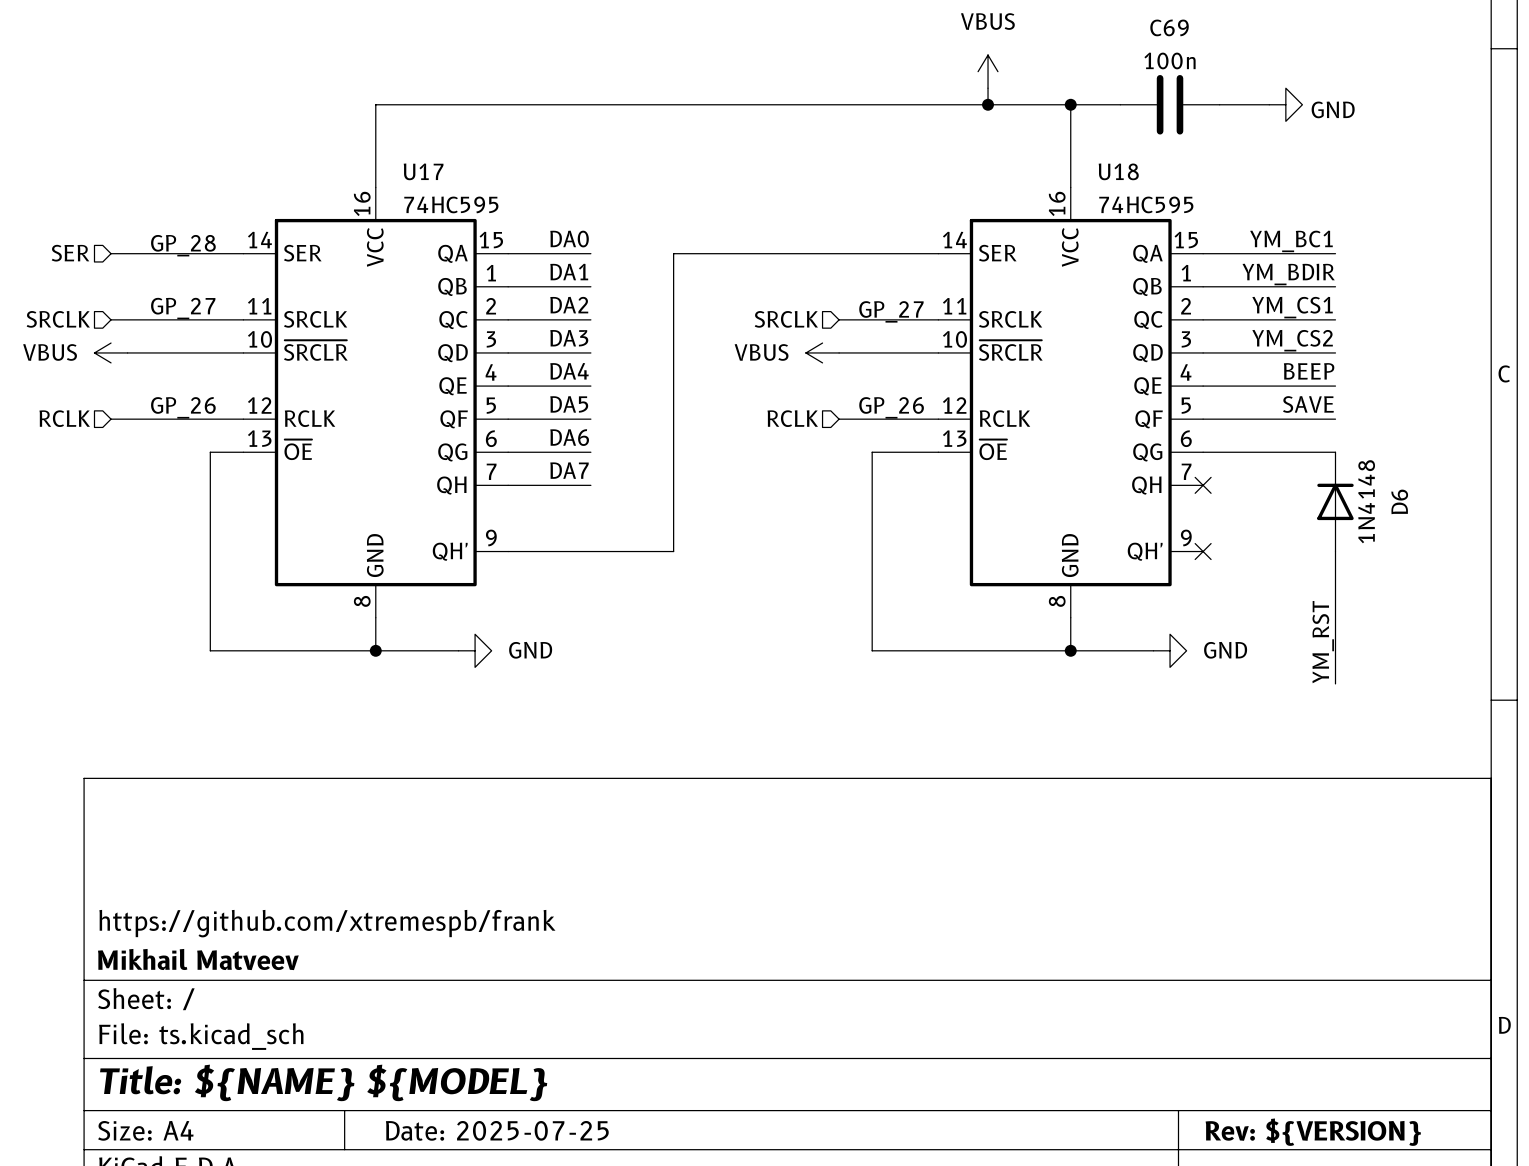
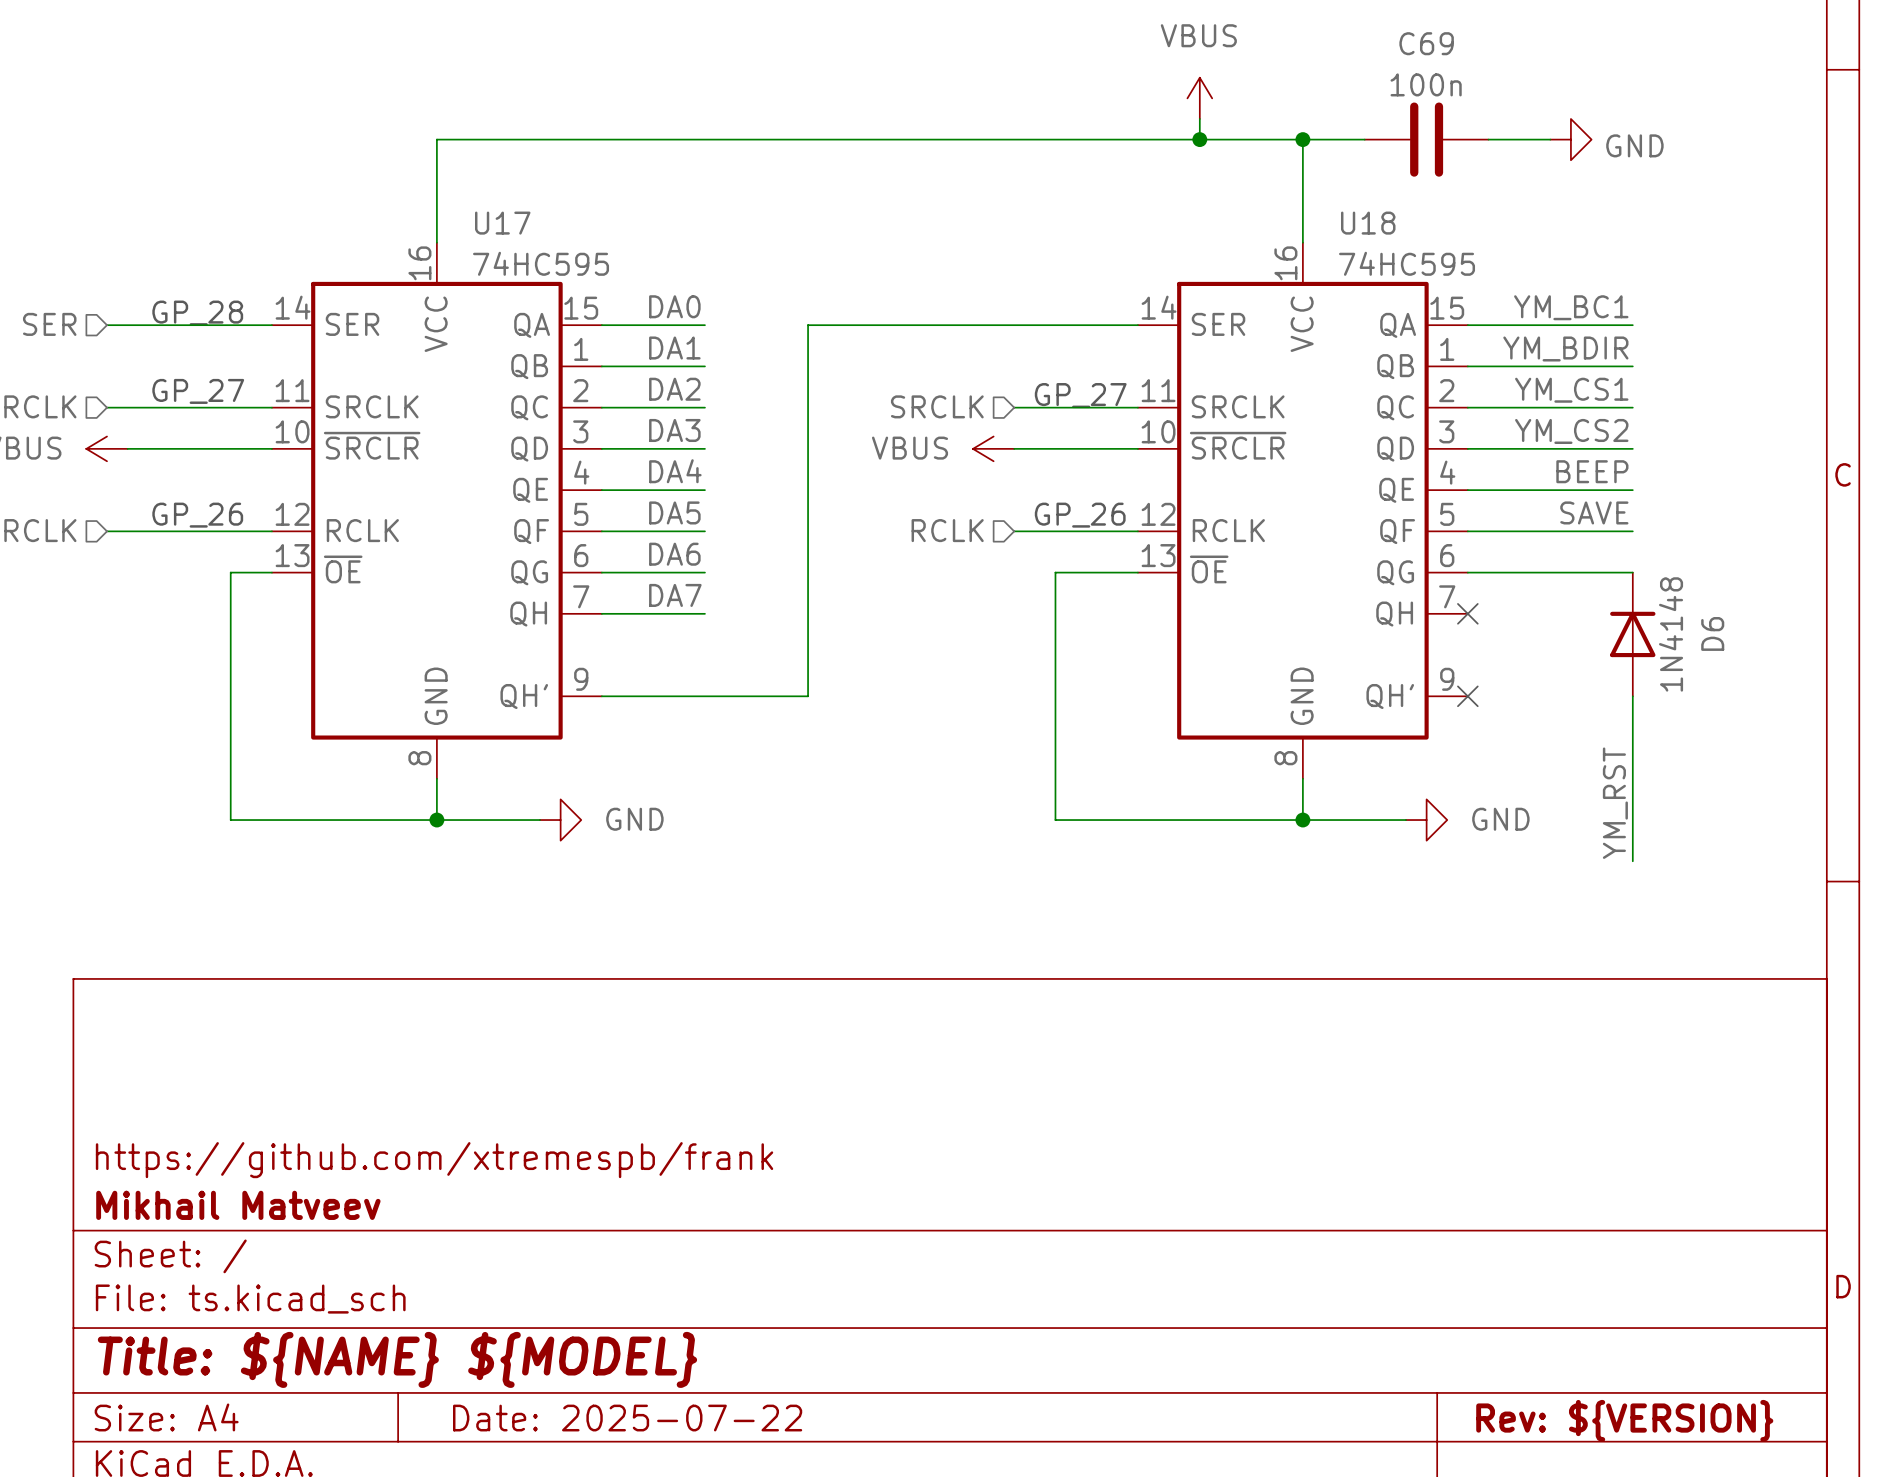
title block: Date: 2025-07-25 (497, 1130) -> Date: 2025-07-22 (627, 1418)

